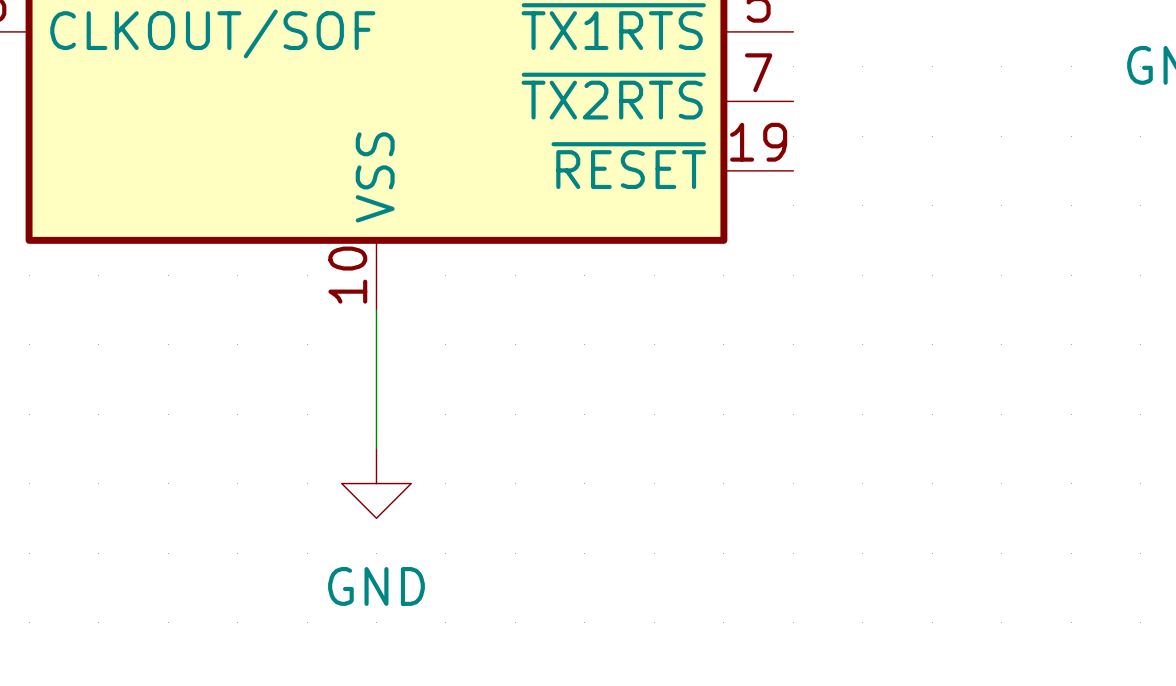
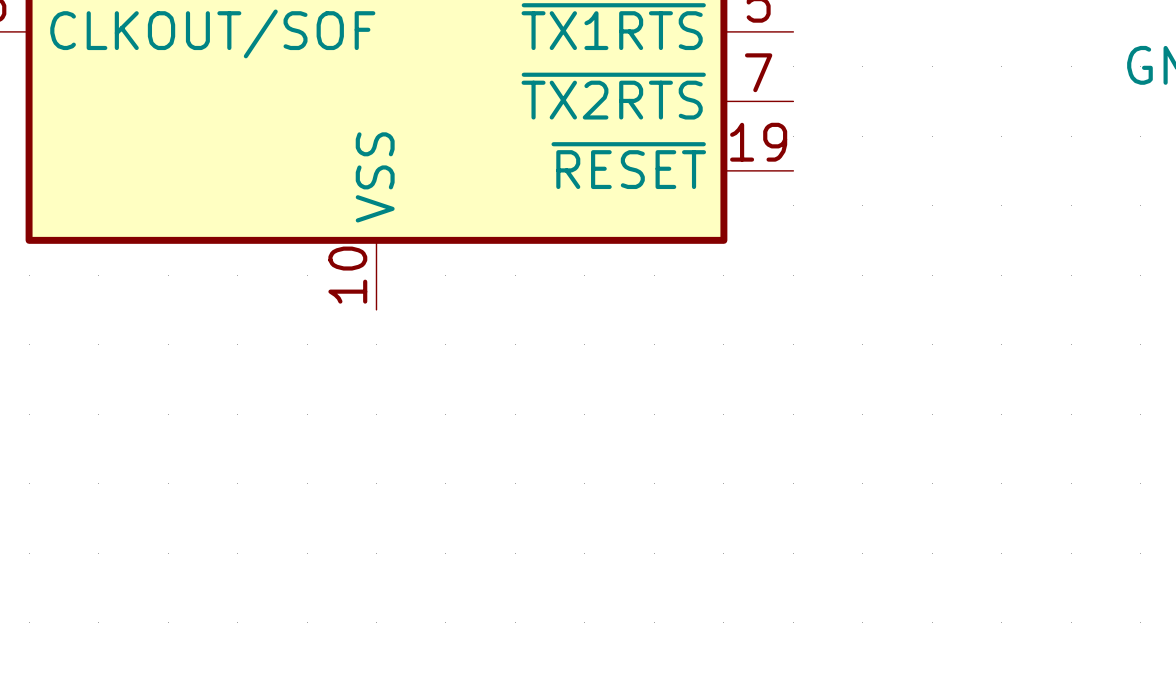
wire: (376, 309) (376, 448) -> none
power symbol: GND (376, 483) -> none

